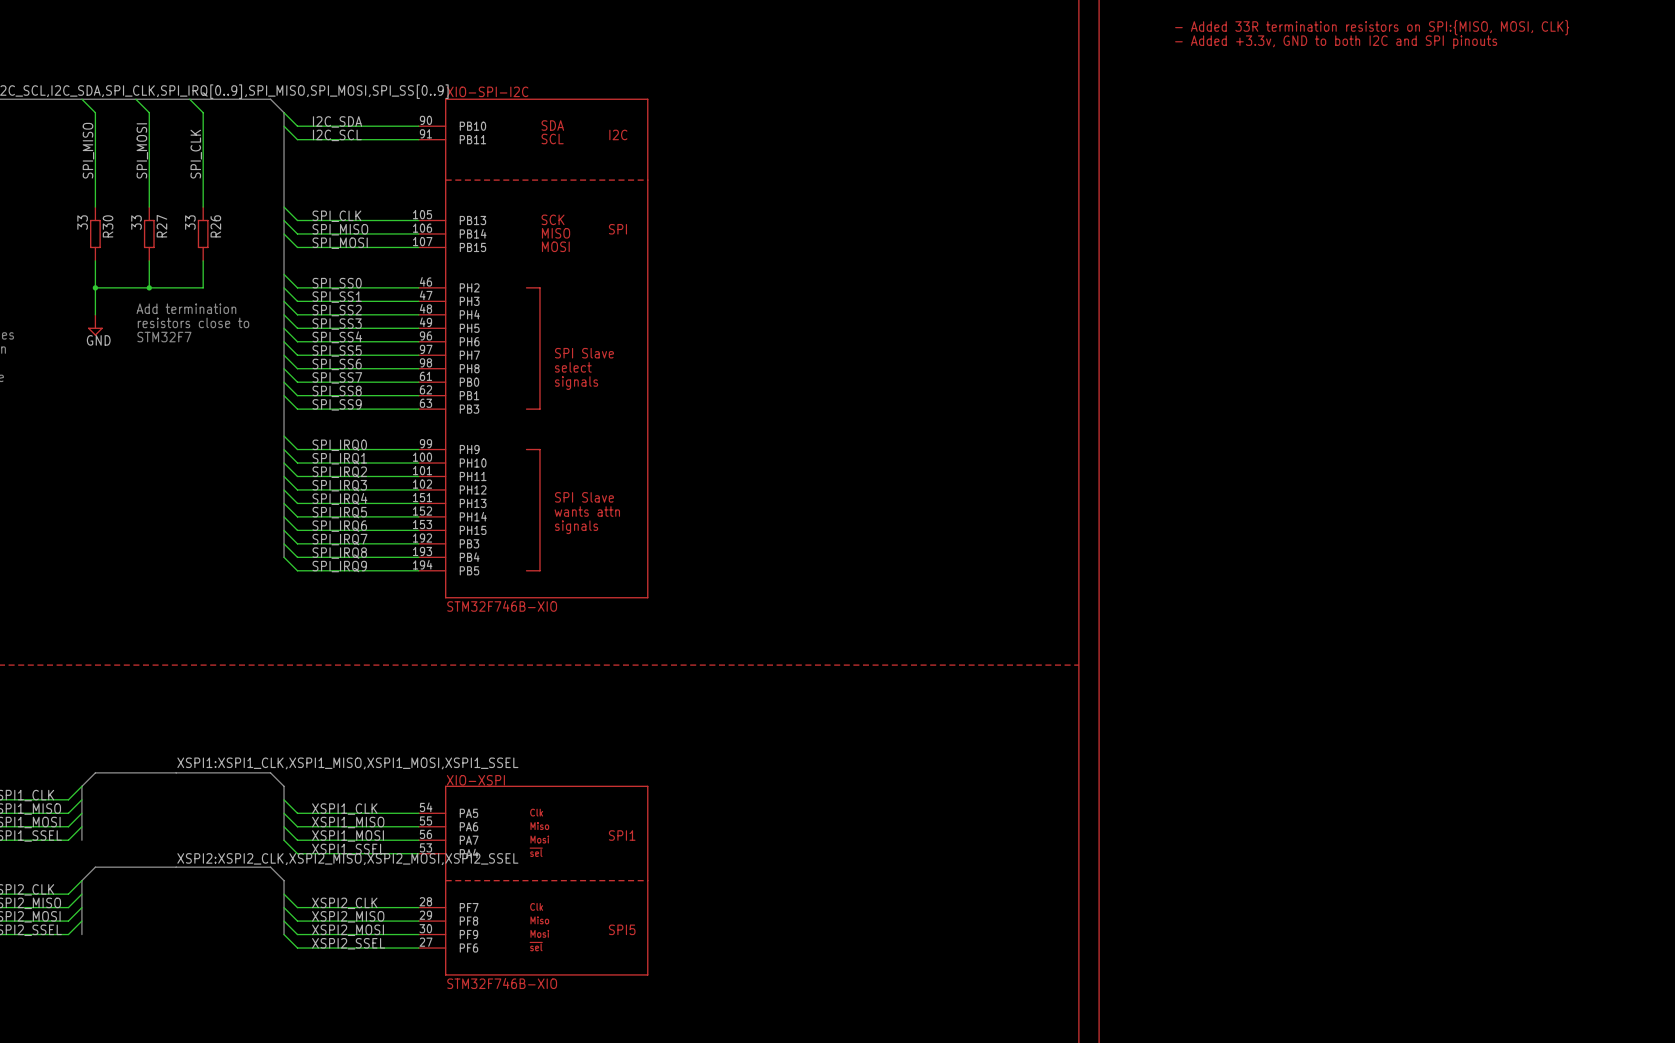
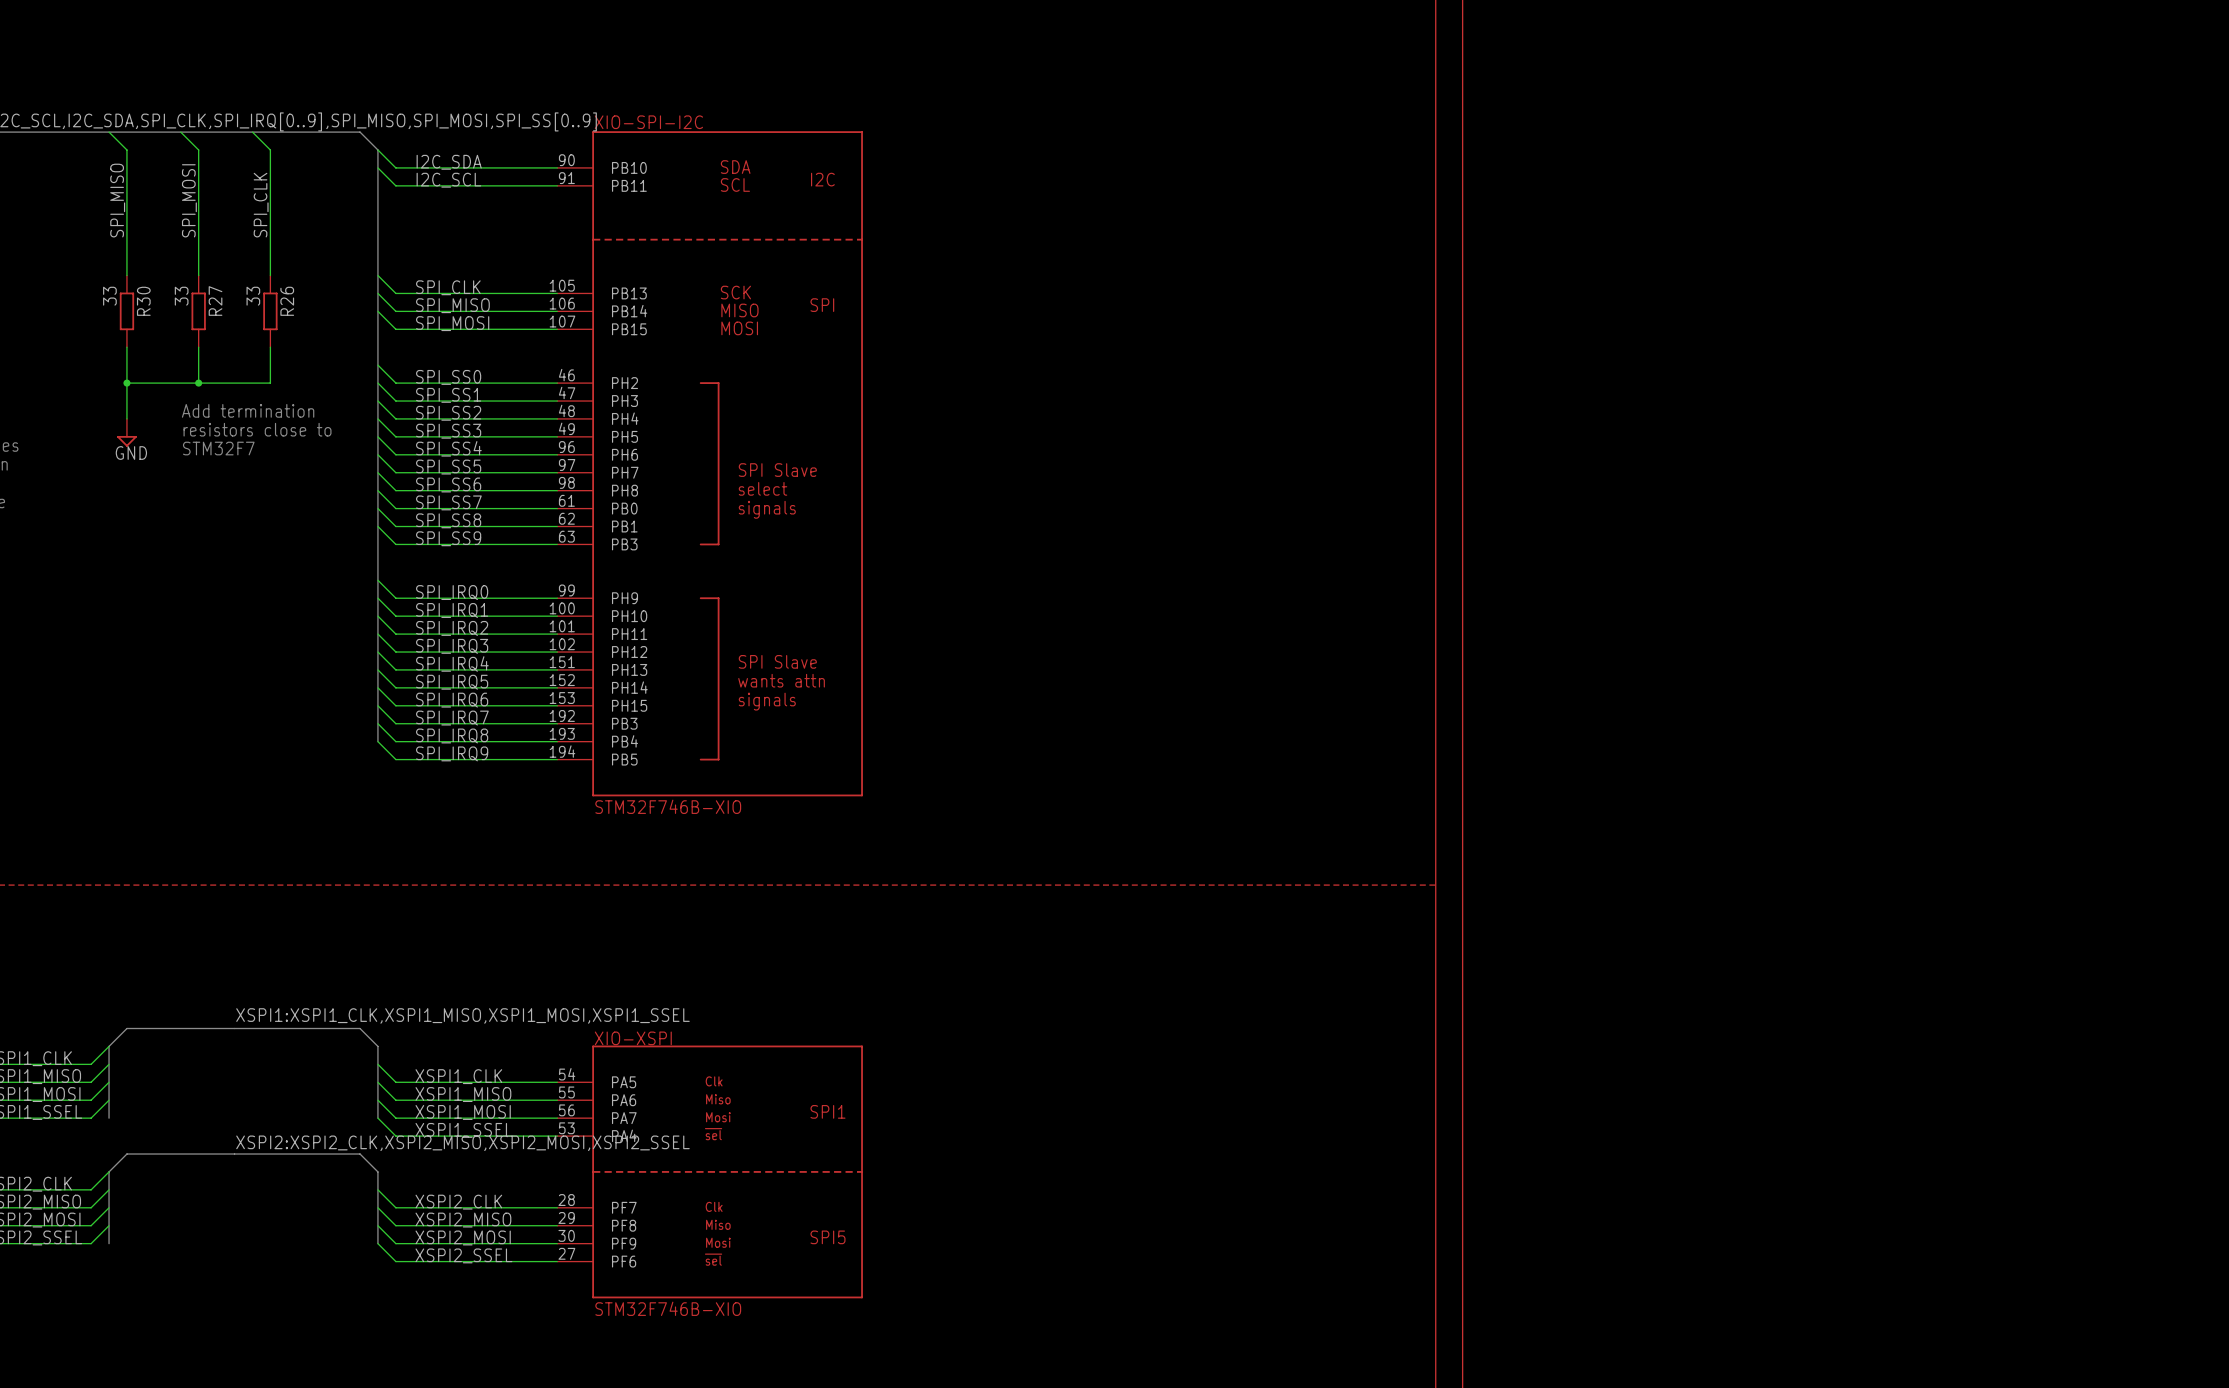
text: - Added 33R termination resistors on SPI:{MISO, MOSI, CLK} (1372, 27) -> none
text: - Added +3.3v, GND to both I2C and SPI pinouts (1336, 42) -> none

